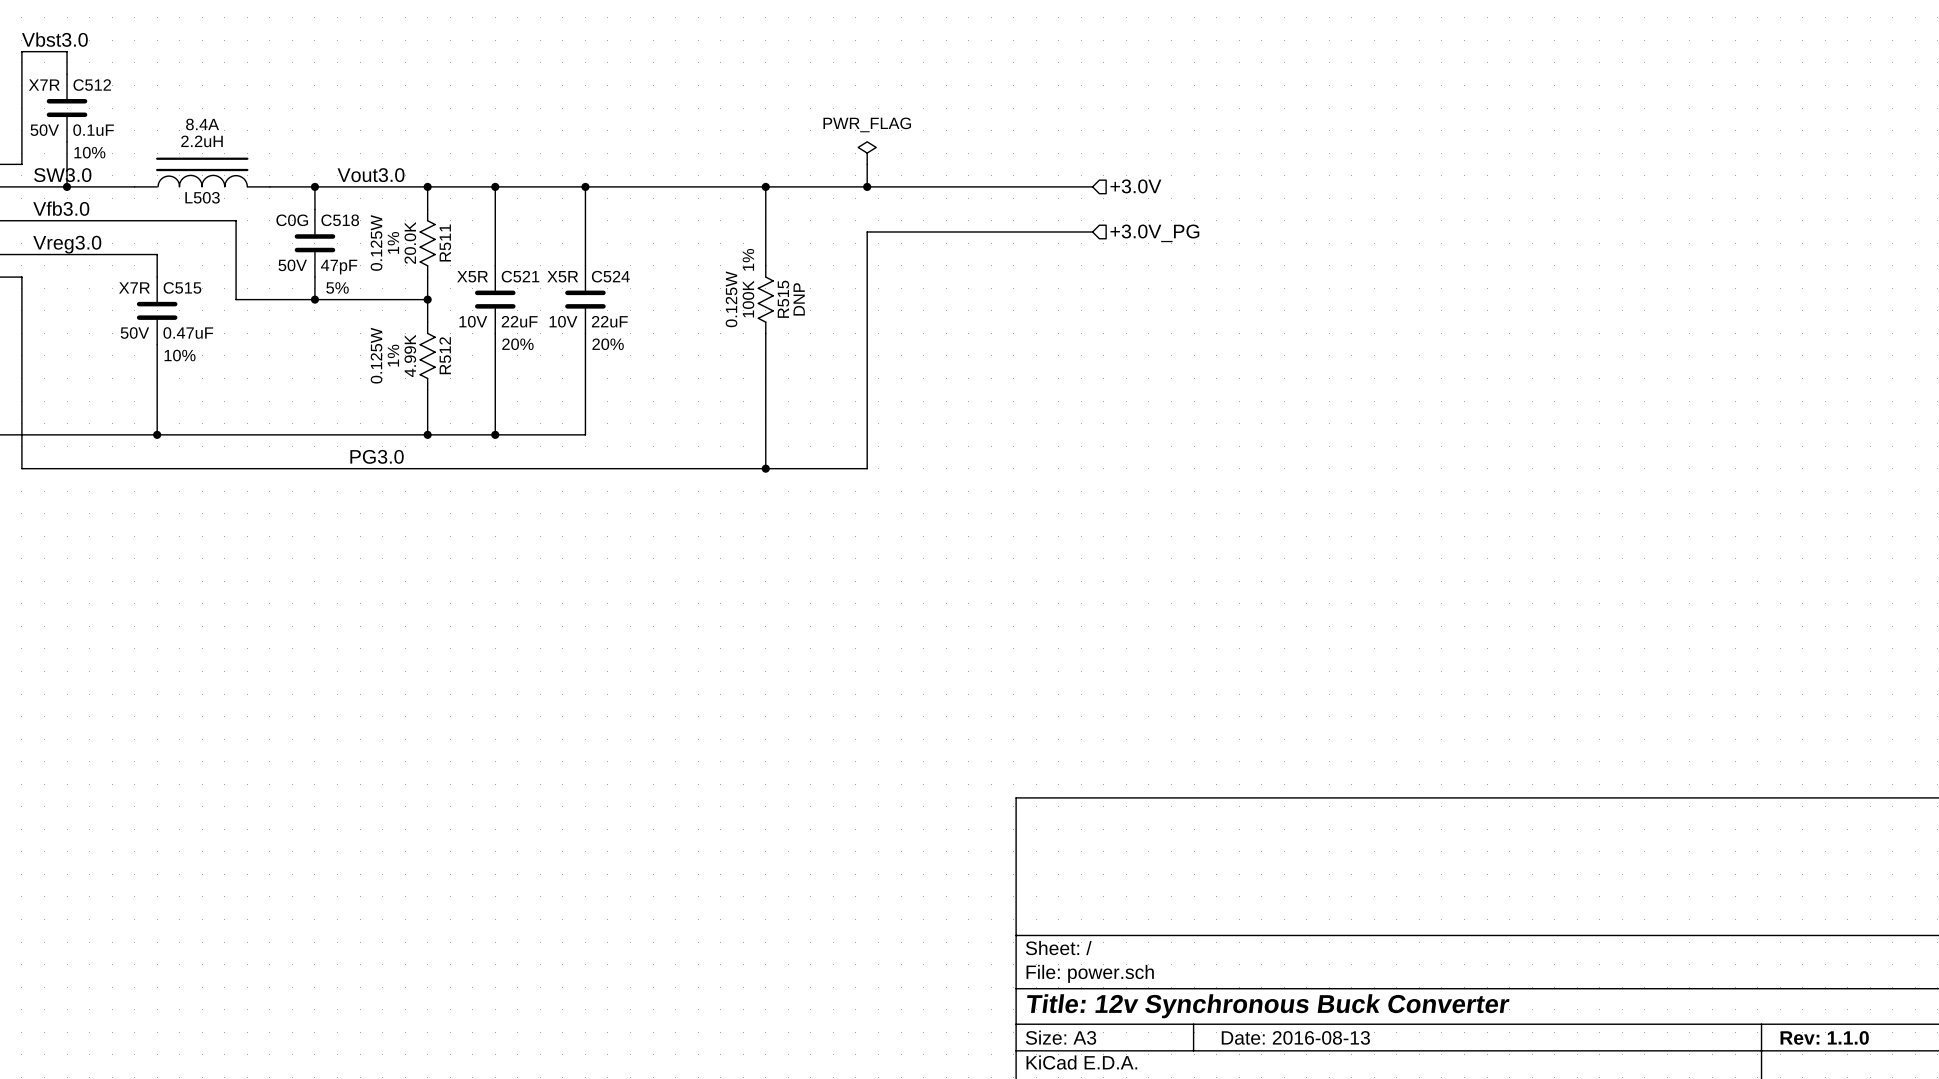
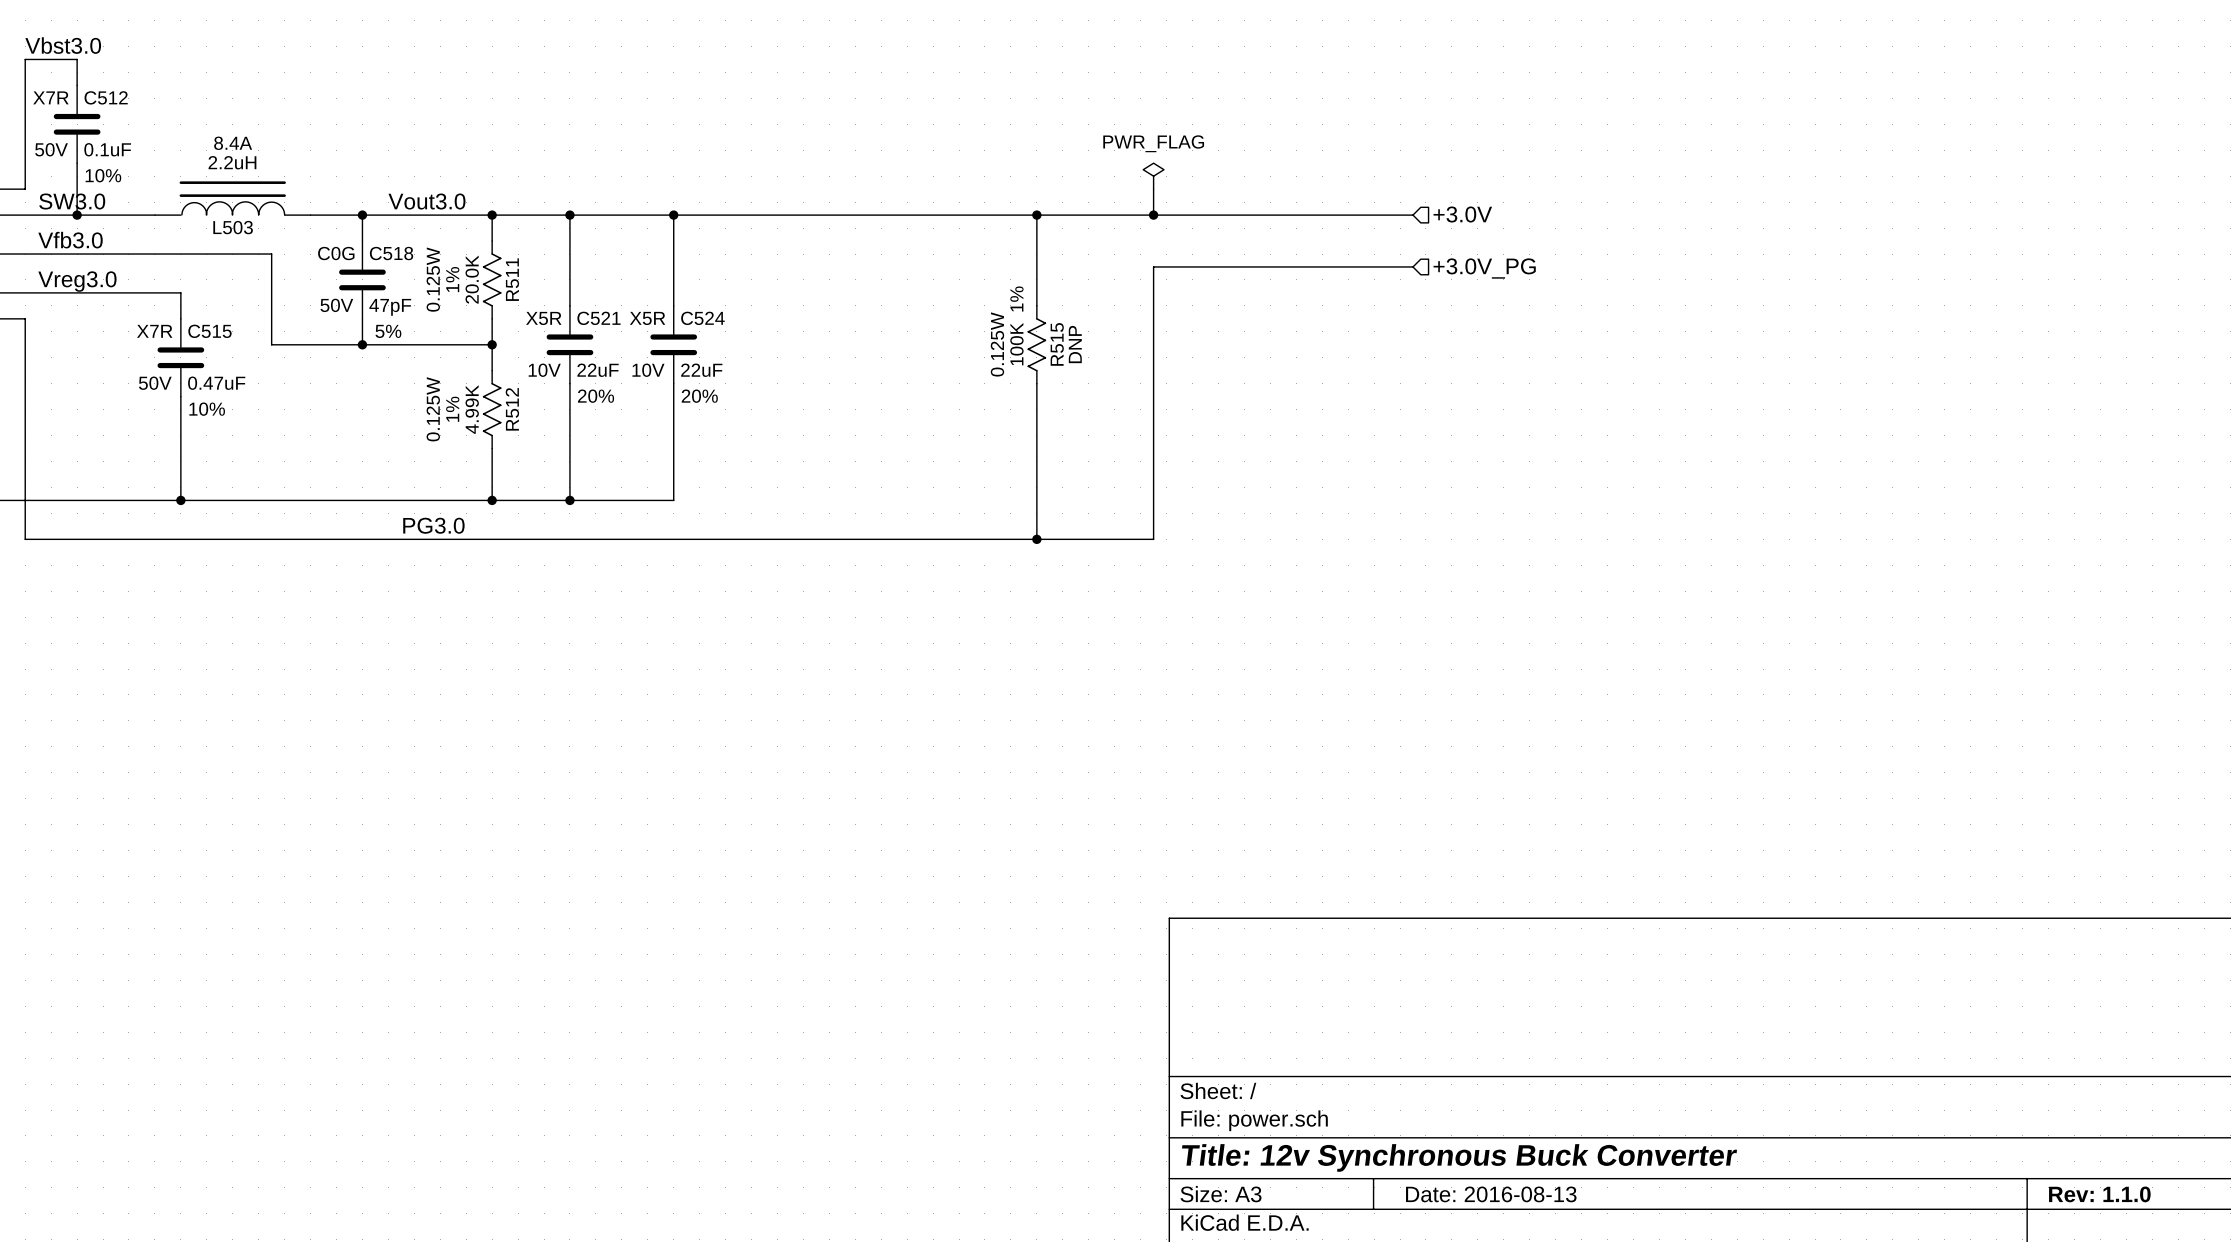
power symbol position: PWR_FLAG (867, 153) -> PWR_FLAG (1153, 176)
wire: (867, 164) (867, 186) -> (1153, 189) (1153, 215)
wire: (765, 186) (765, 265) -> (1036, 215) (1036, 305)
junction: (765, 186) -> none
junction position: (867, 186) -> (1036, 215)
junction: none -> (1153, 215)
wire: none -> (1257, 215) (1412, 215)
hierarchical label position: +3.0V (1135, 186) -> +3.0V (1462, 214)
wire: (1002, 231) (867, 231) (867, 468) -> (1153, 266) (1153, 539) (997, 539)
wire: none -> (1257, 266) (1412, 266)
hierarchical label position: +3.0V_PG (1154, 233) -> +3.0V_PG (1484, 268)
R515 position: (765, 299) -> (1036, 344)
wire: (765, 333) (765, 468) -> (1036, 383) (1036, 539)
junction: (765, 468) -> none
junction: none -> (1036, 539)

